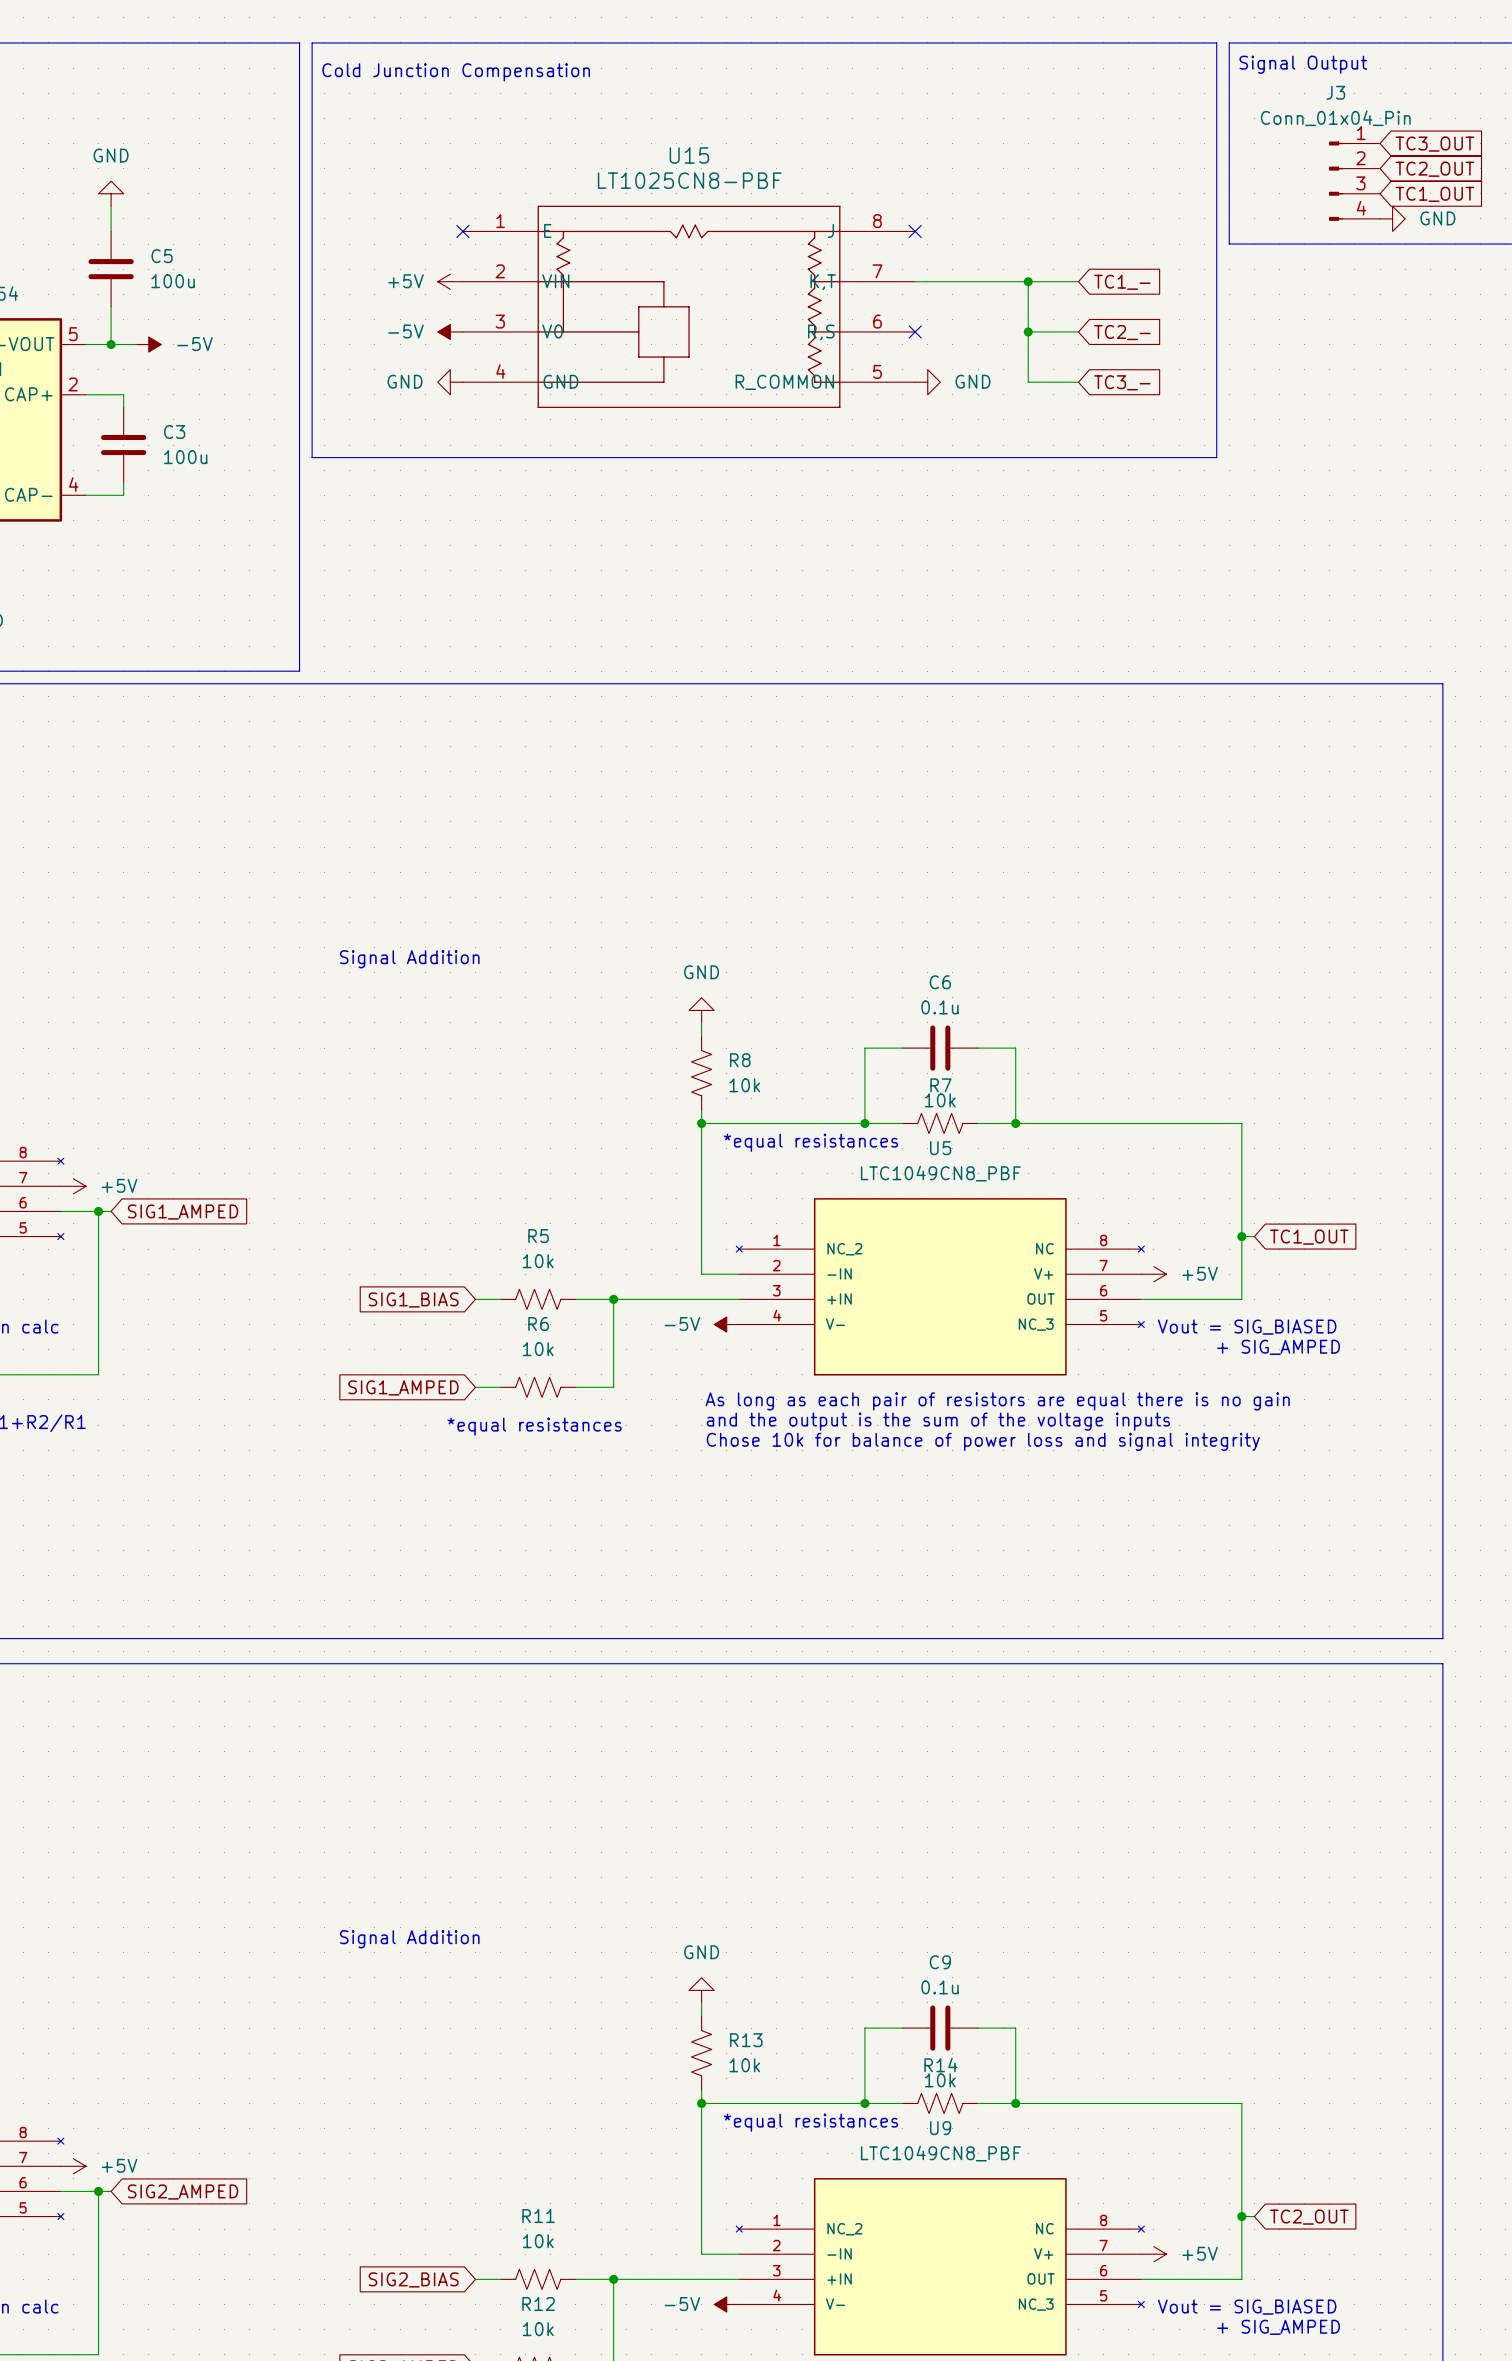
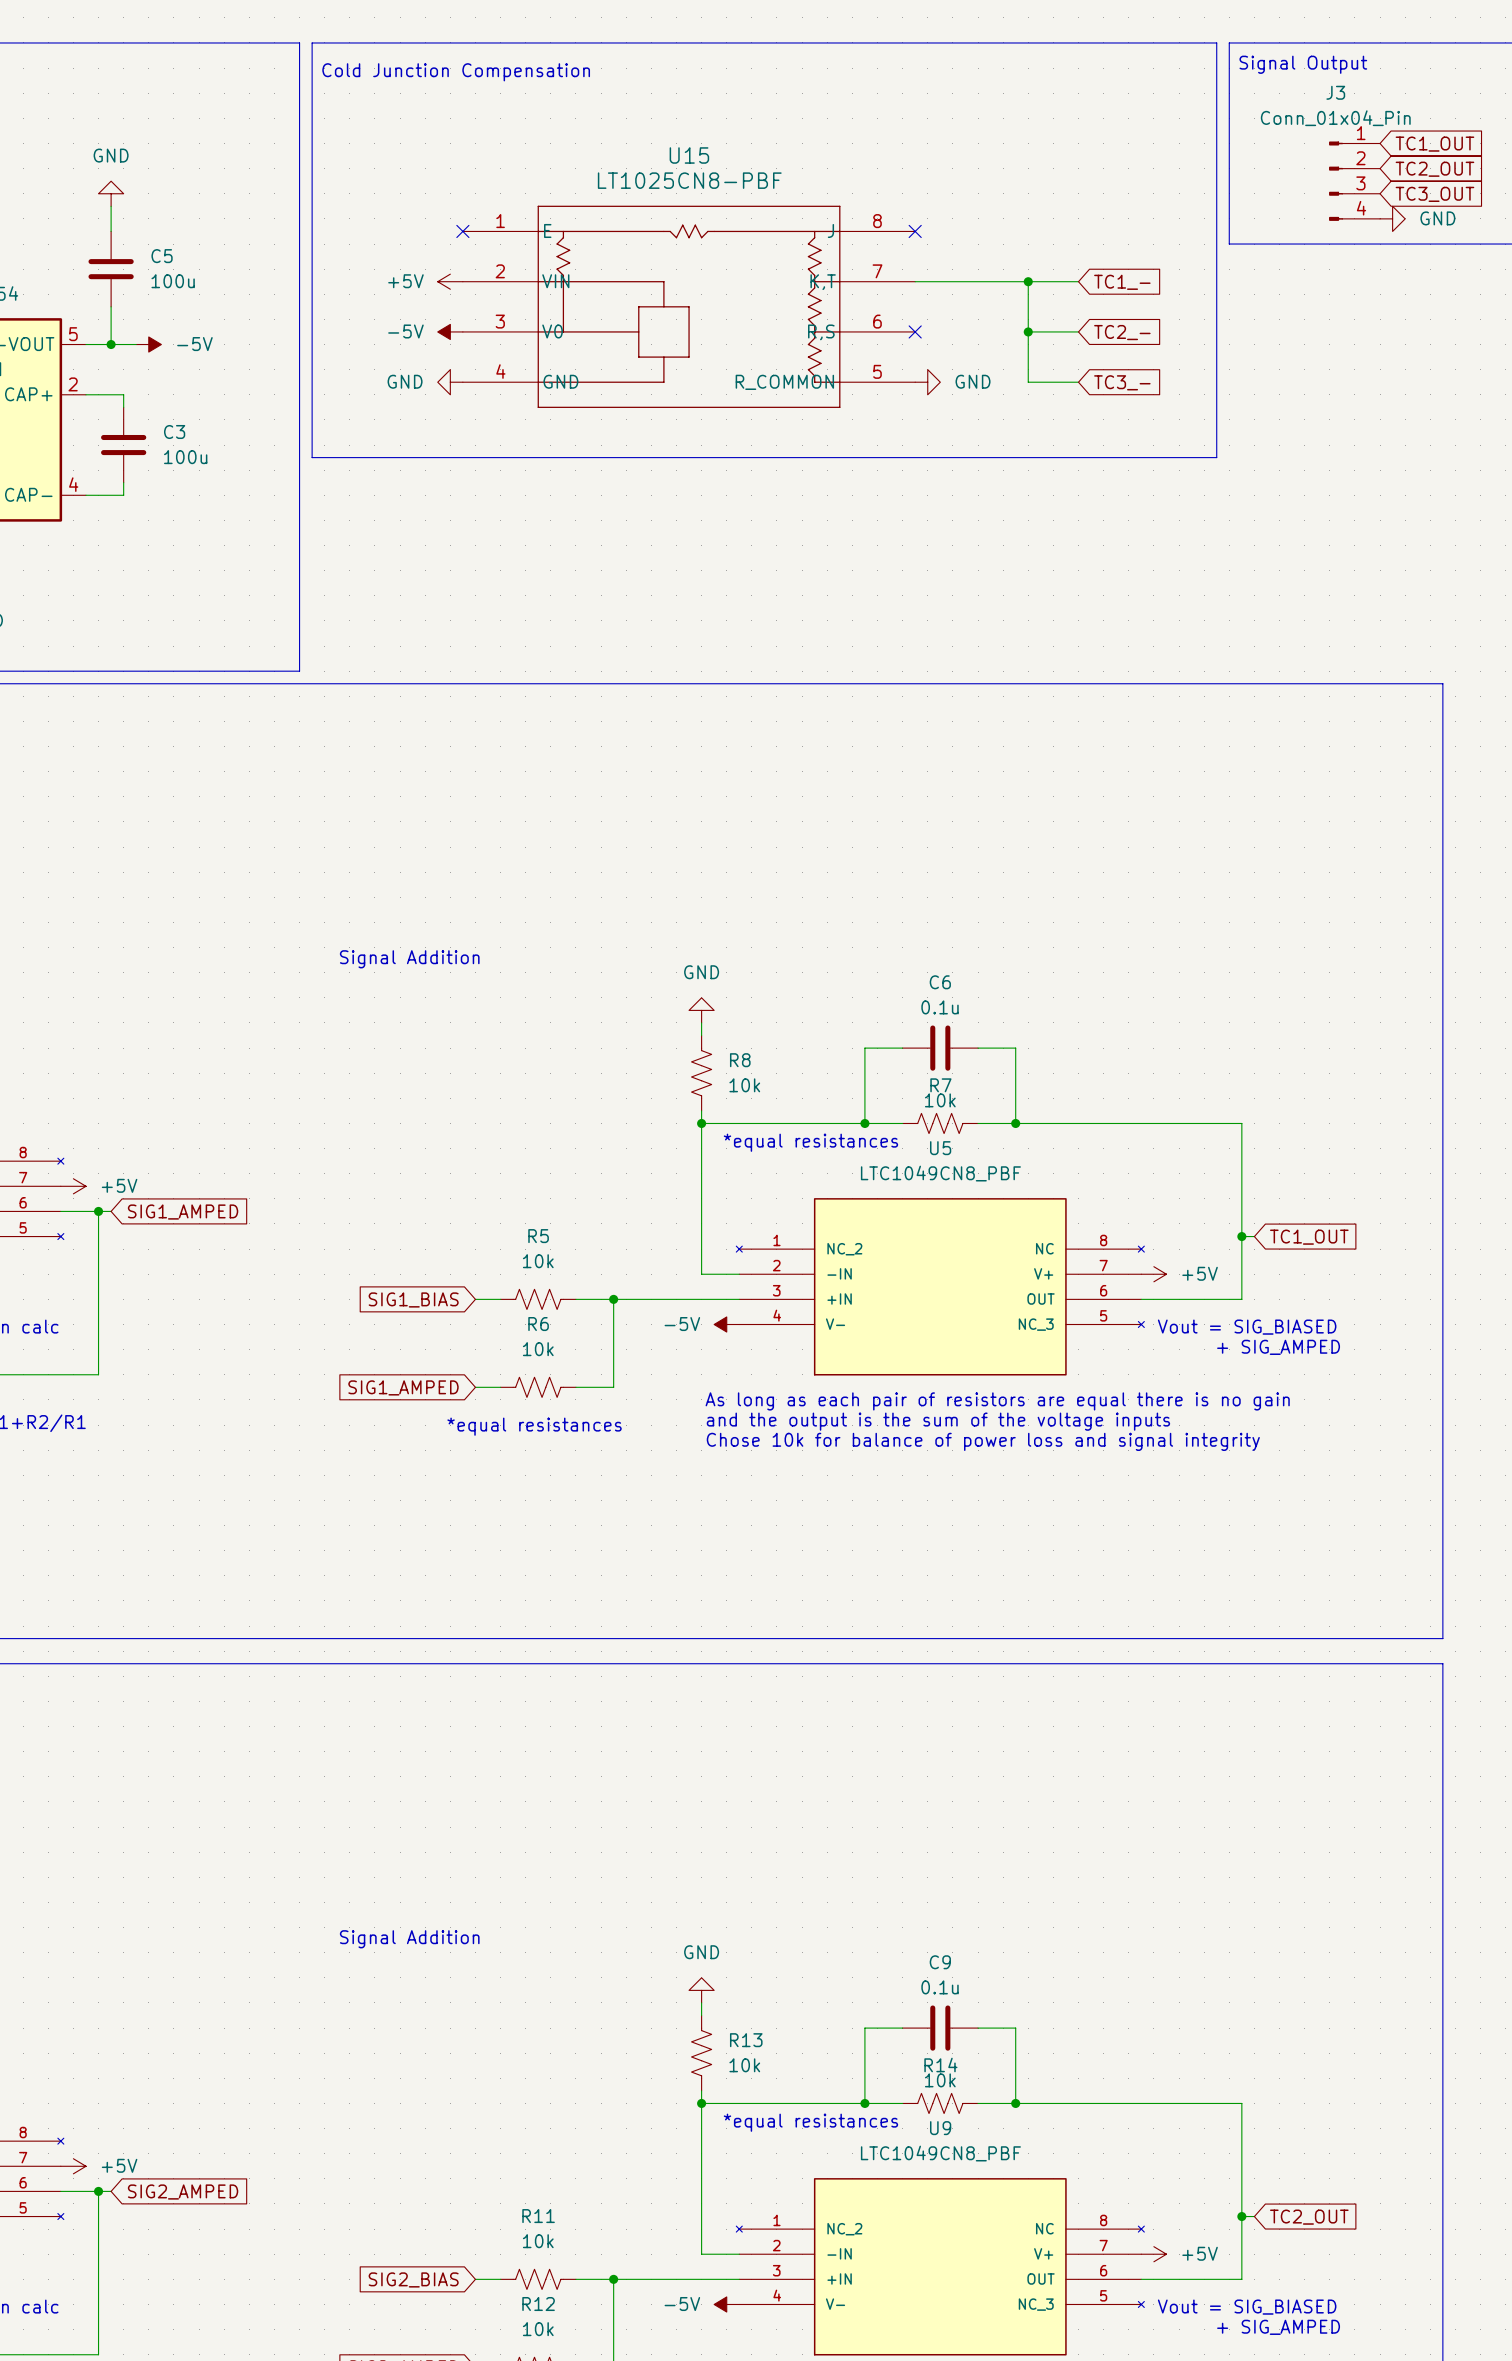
global label: TC3_OUT (1434, 144) -> TC1_OUT (1434, 144)
global label: TC1_OUT (1434, 194) -> TC3_OUT (1434, 194)

